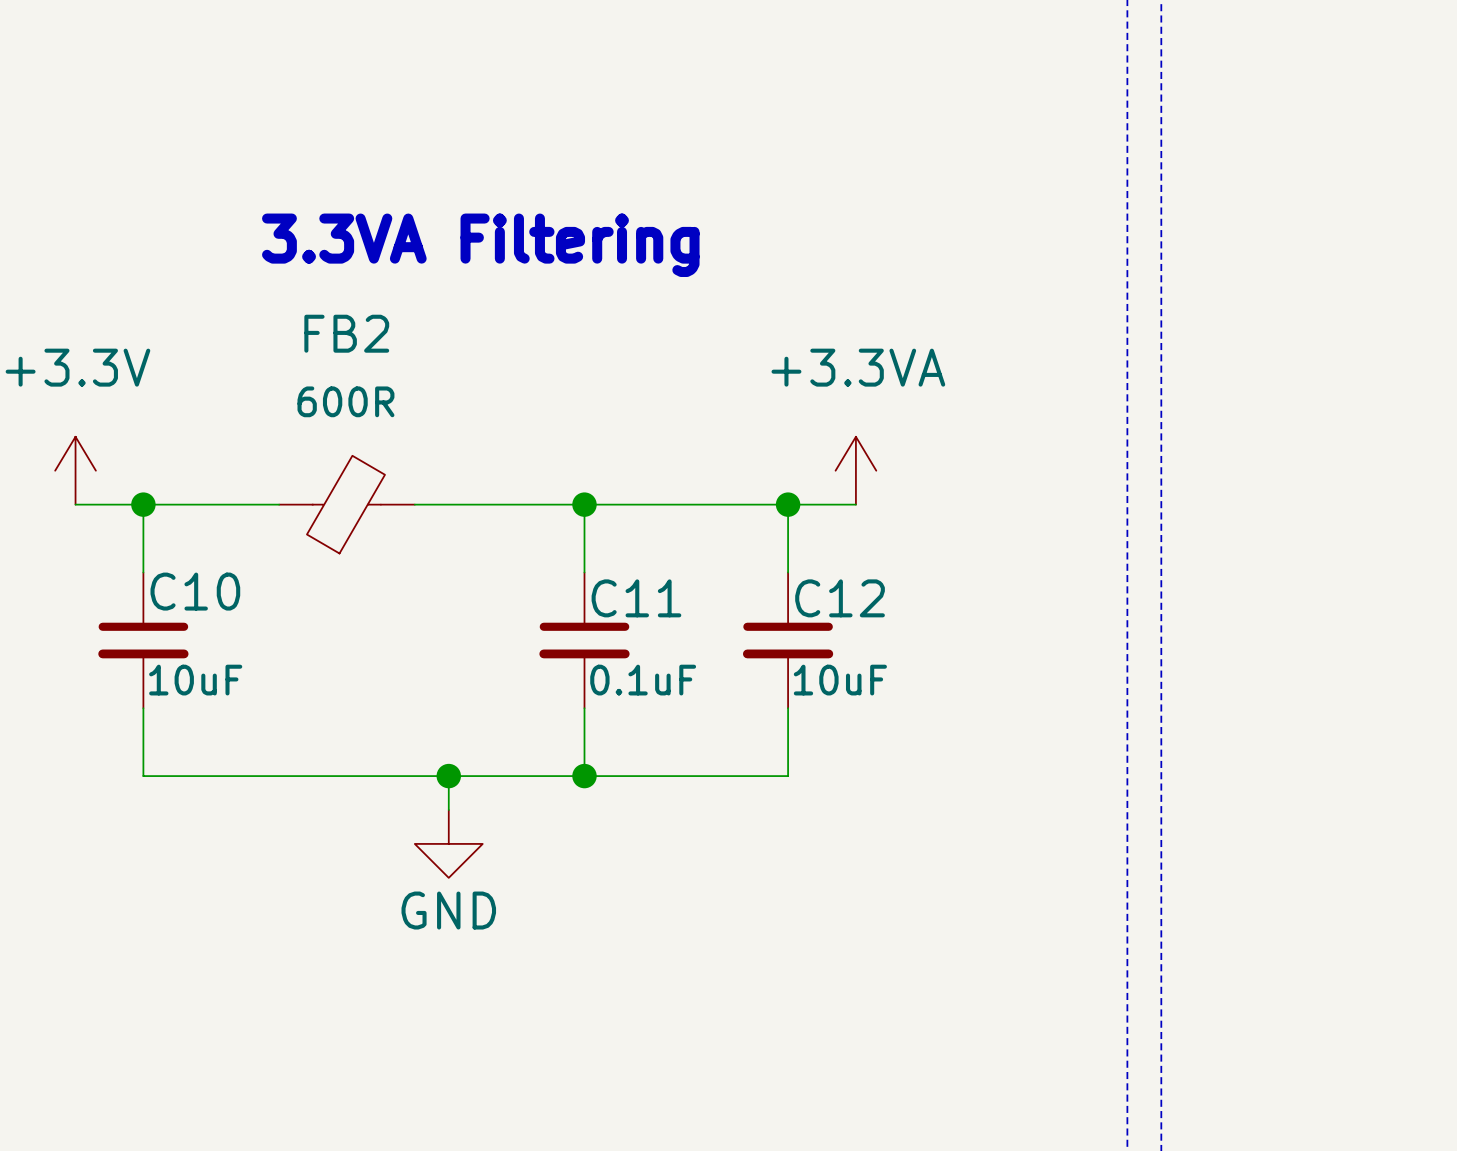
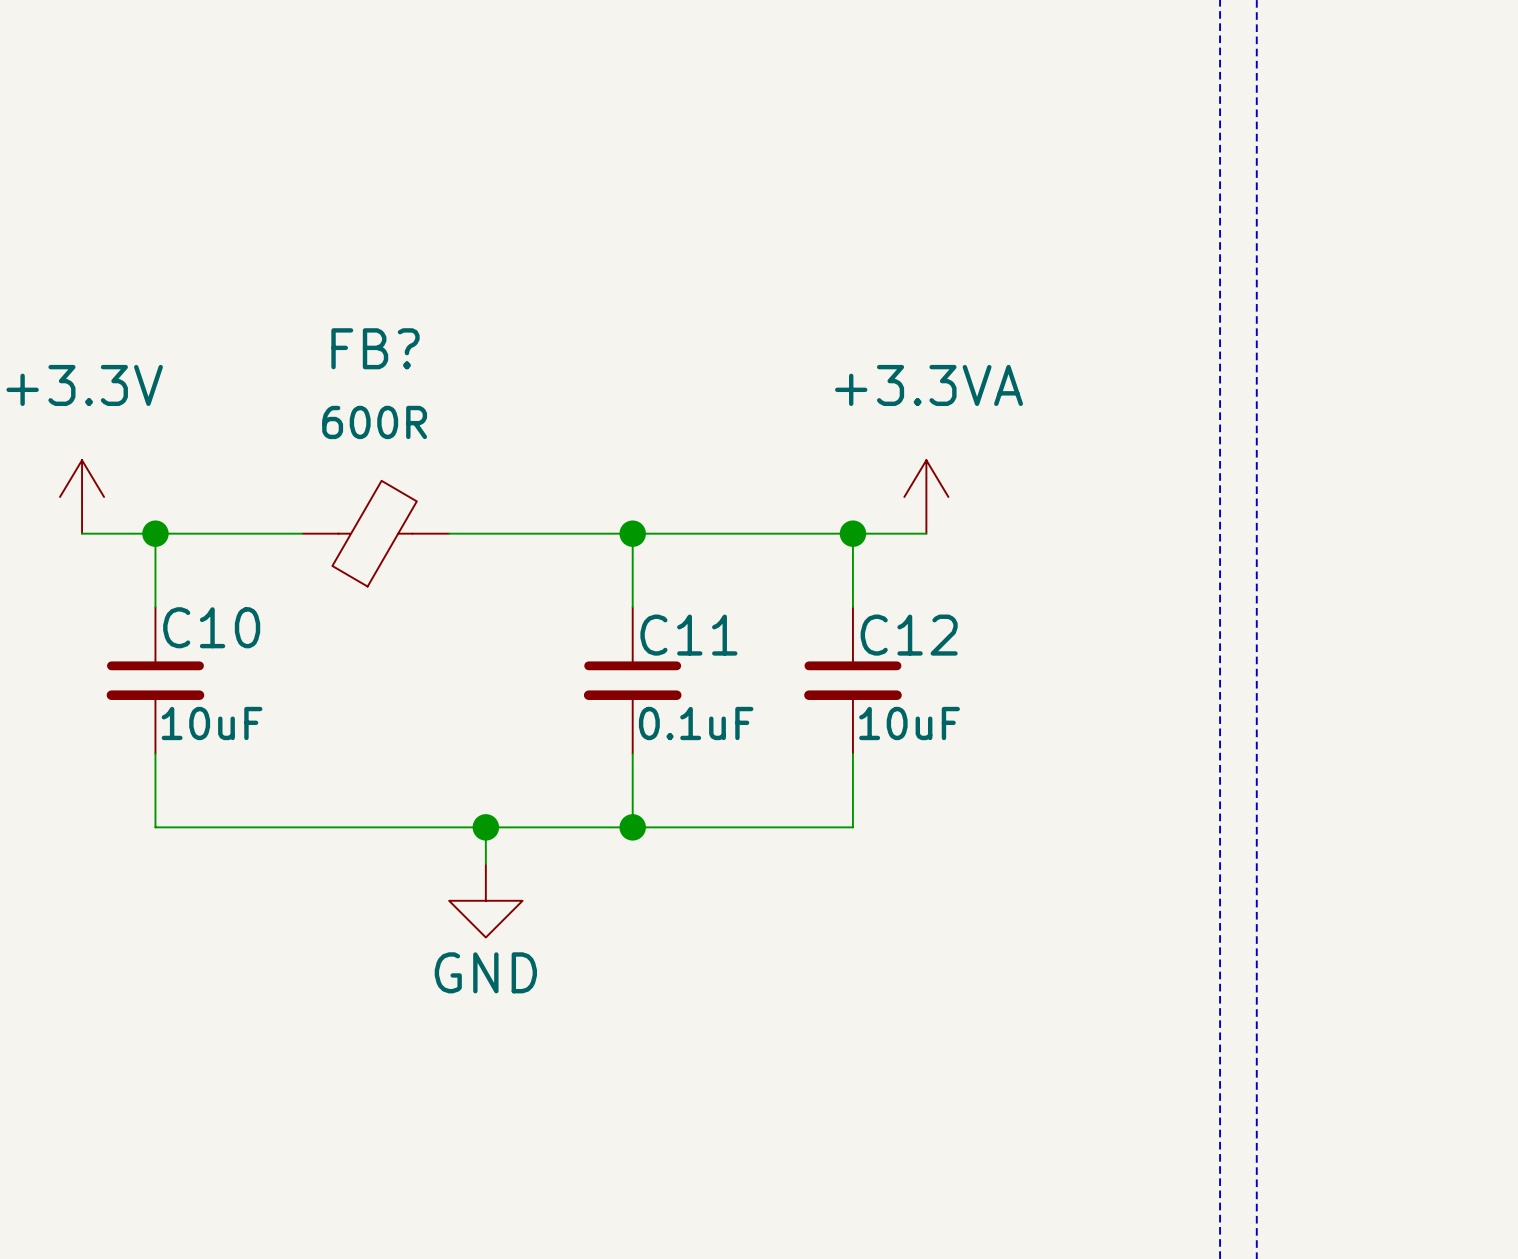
text: 3.3VA Filtering (480, 245) -> none
FB2 name: FB2 (346, 333) -> FB? (375, 348)

